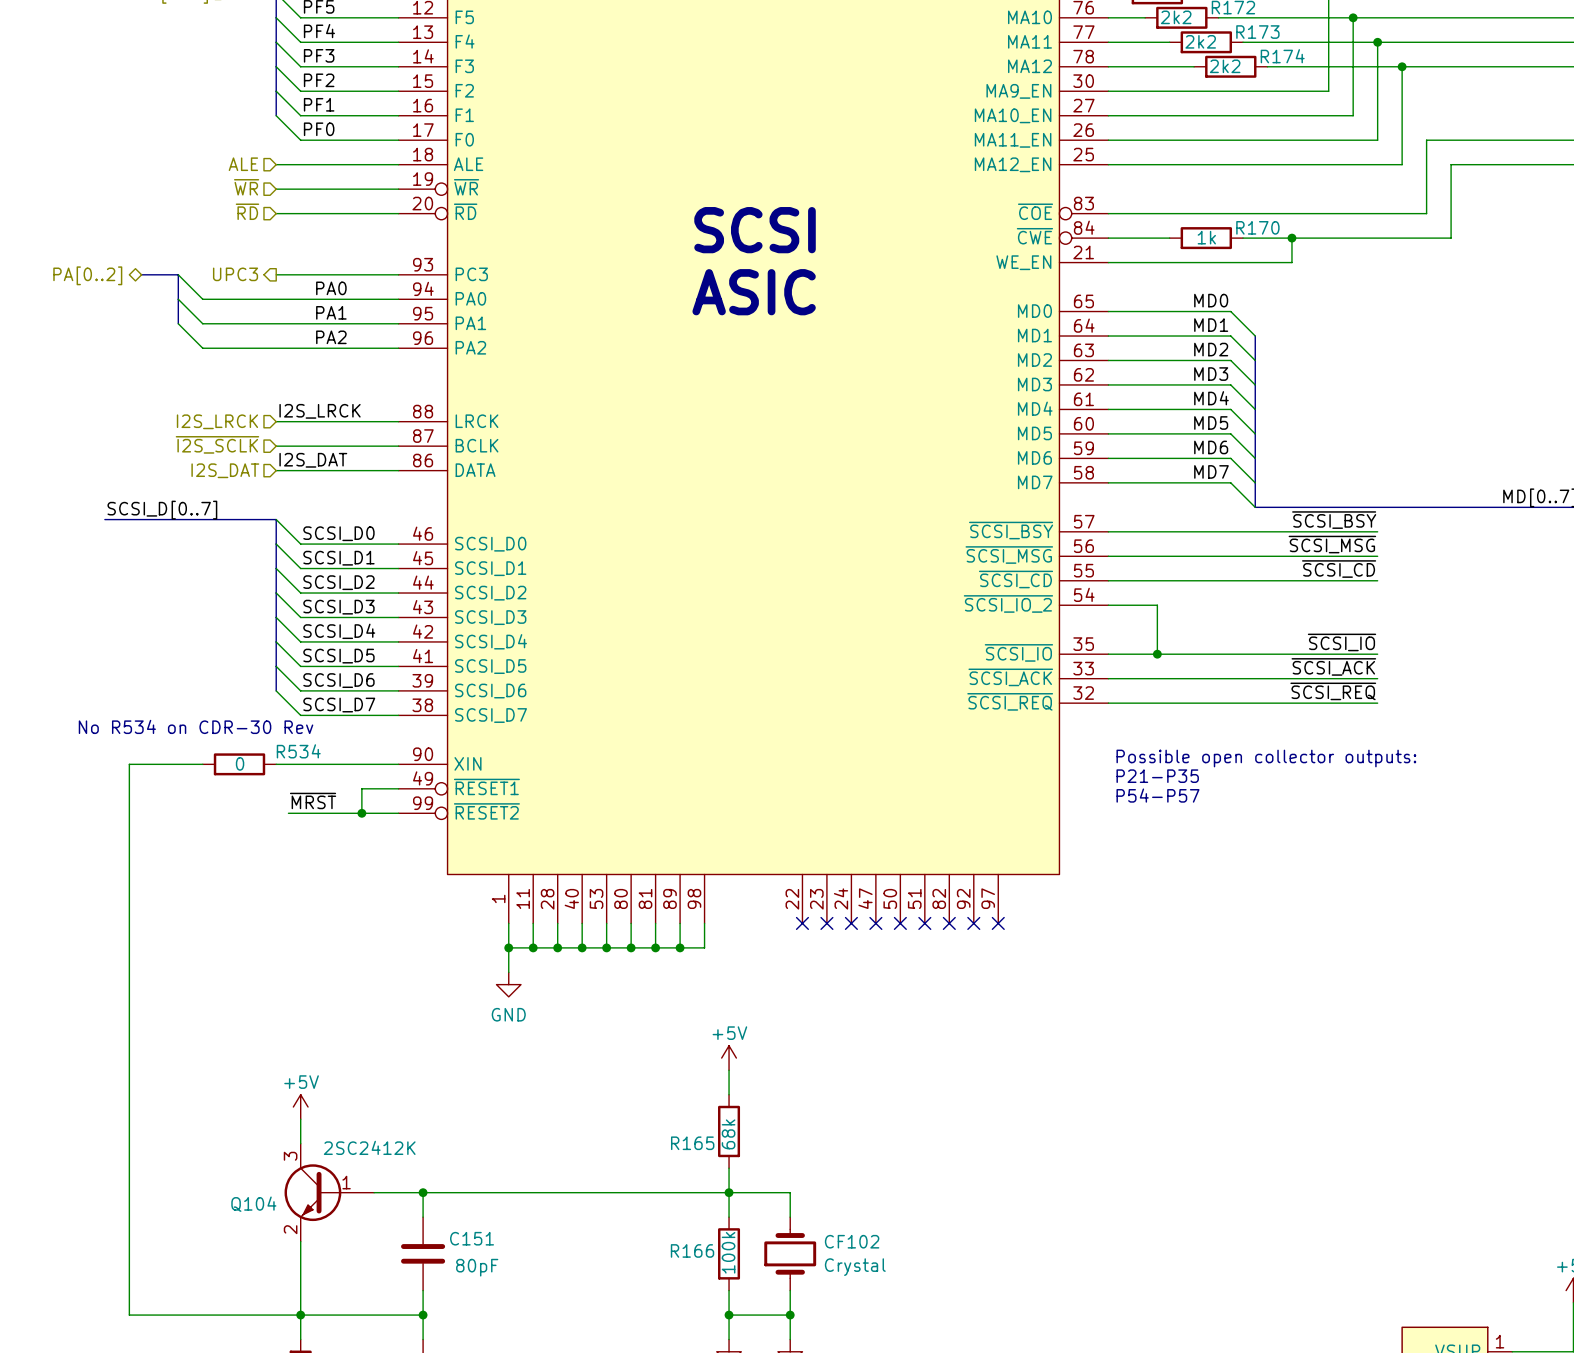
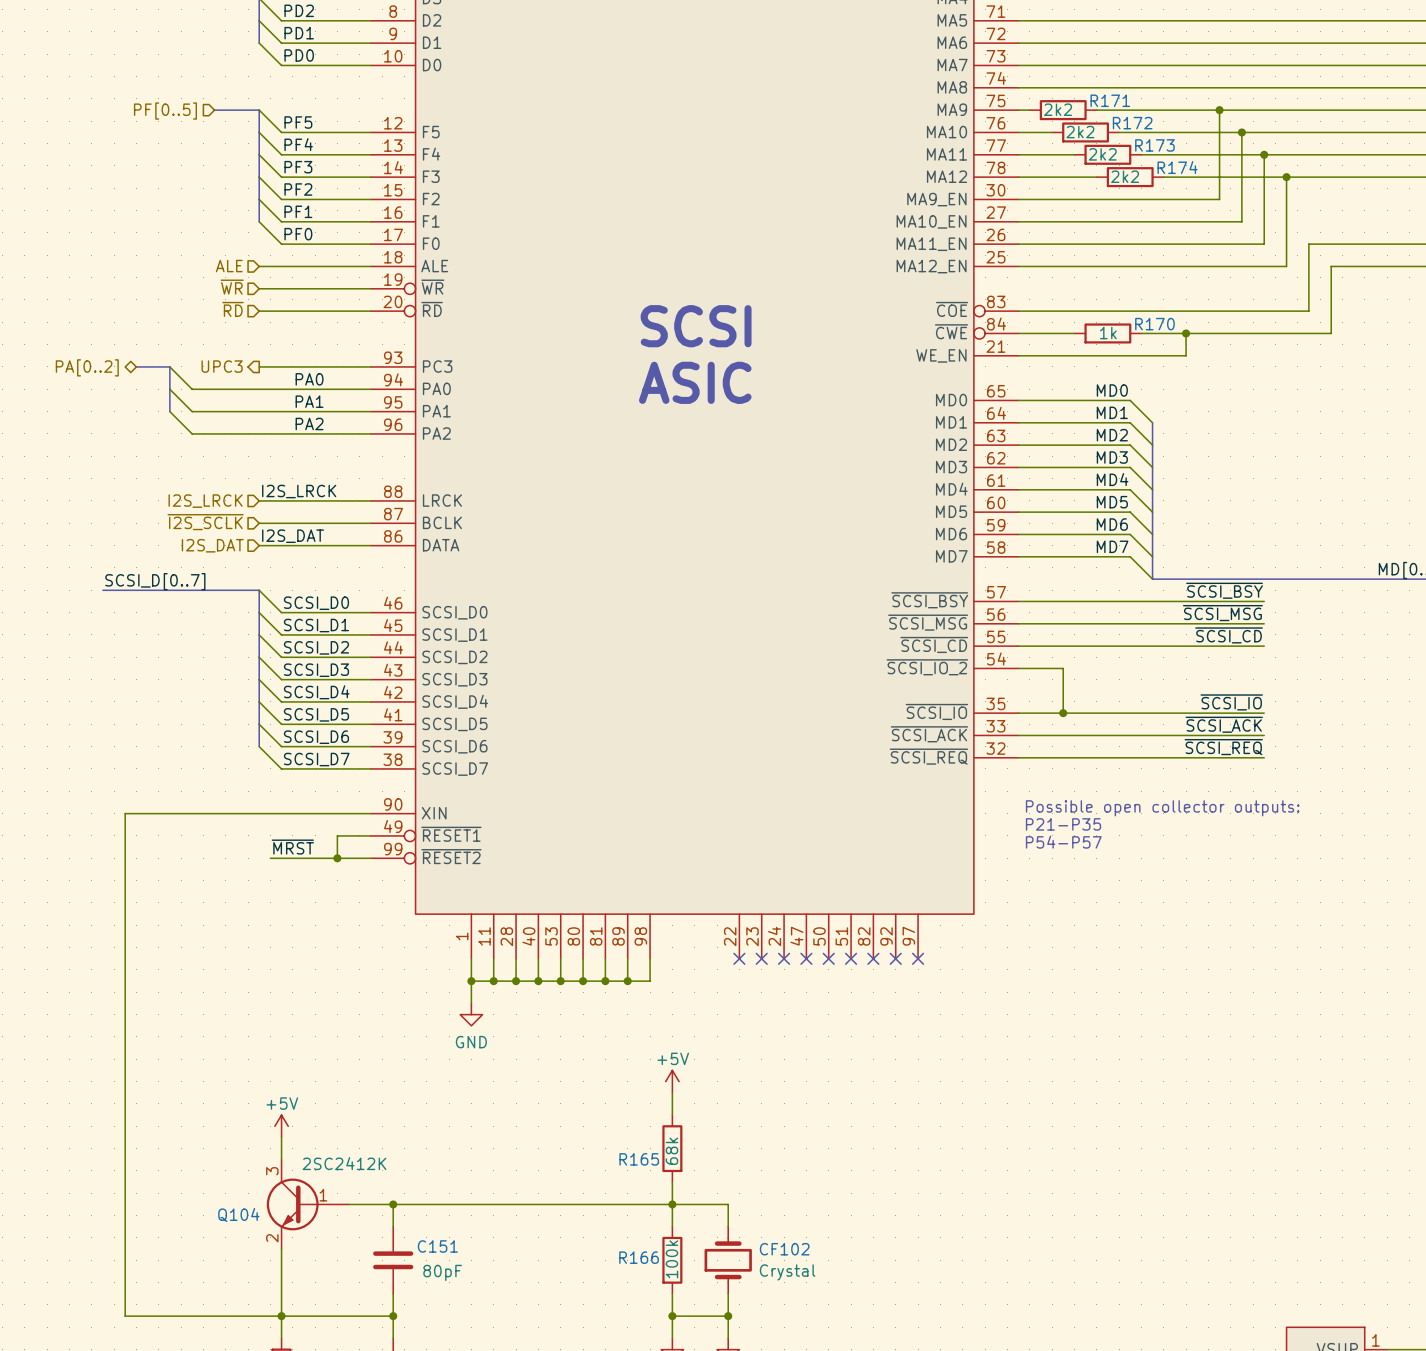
text: No R534 on CDR-30 Rev (196, 726) -> none
wire: none -> (192, 813) (259, 813)
R534: 0 (239, 764) -> none

